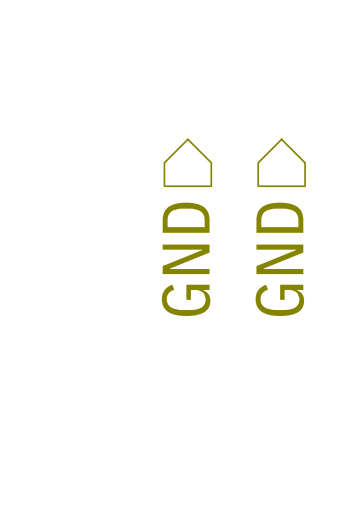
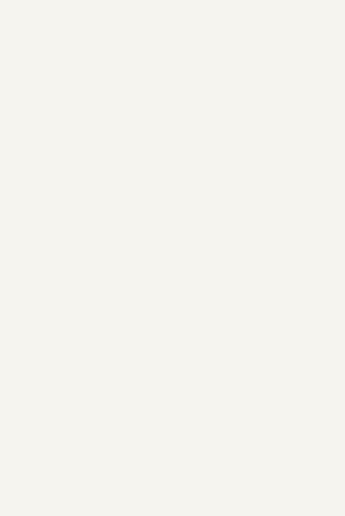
hierarchical label: GND (186, 259) -> none
hierarchical label: GND (279, 259) -> none

